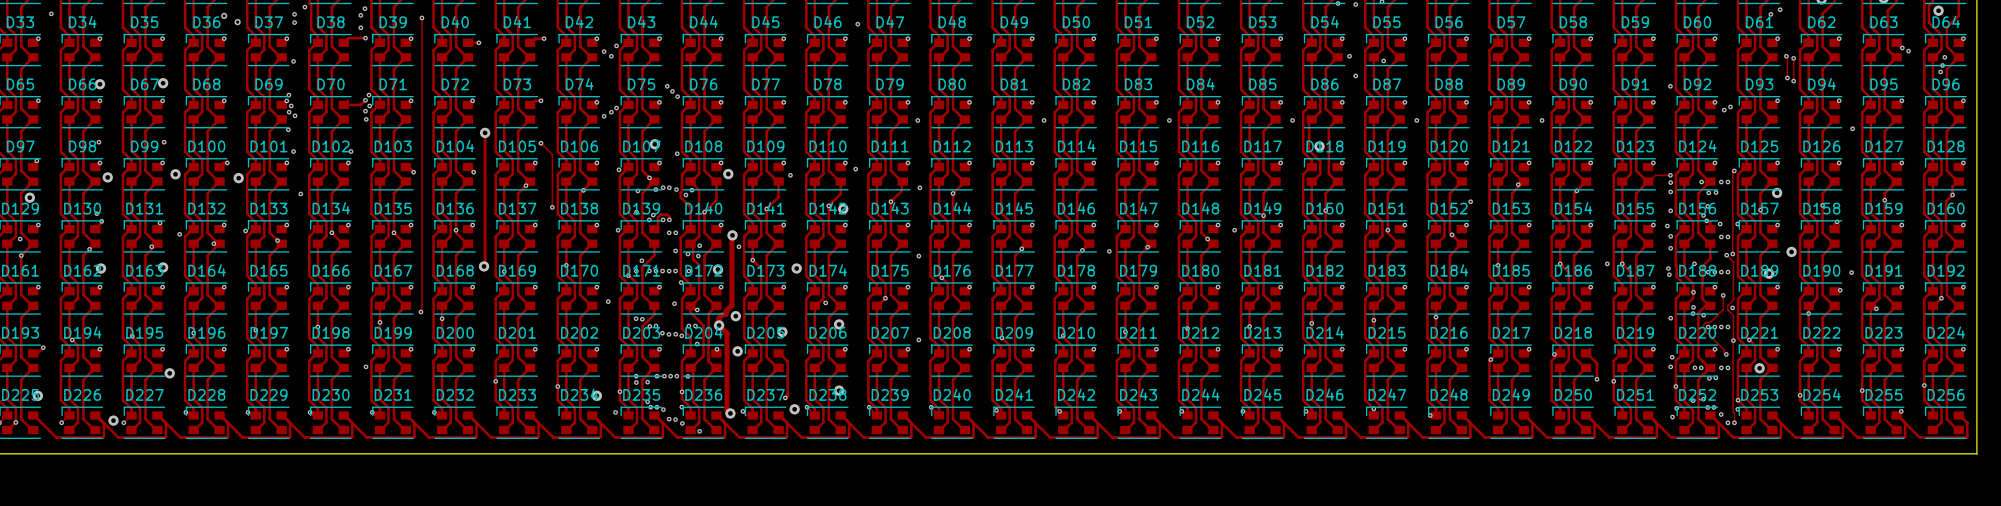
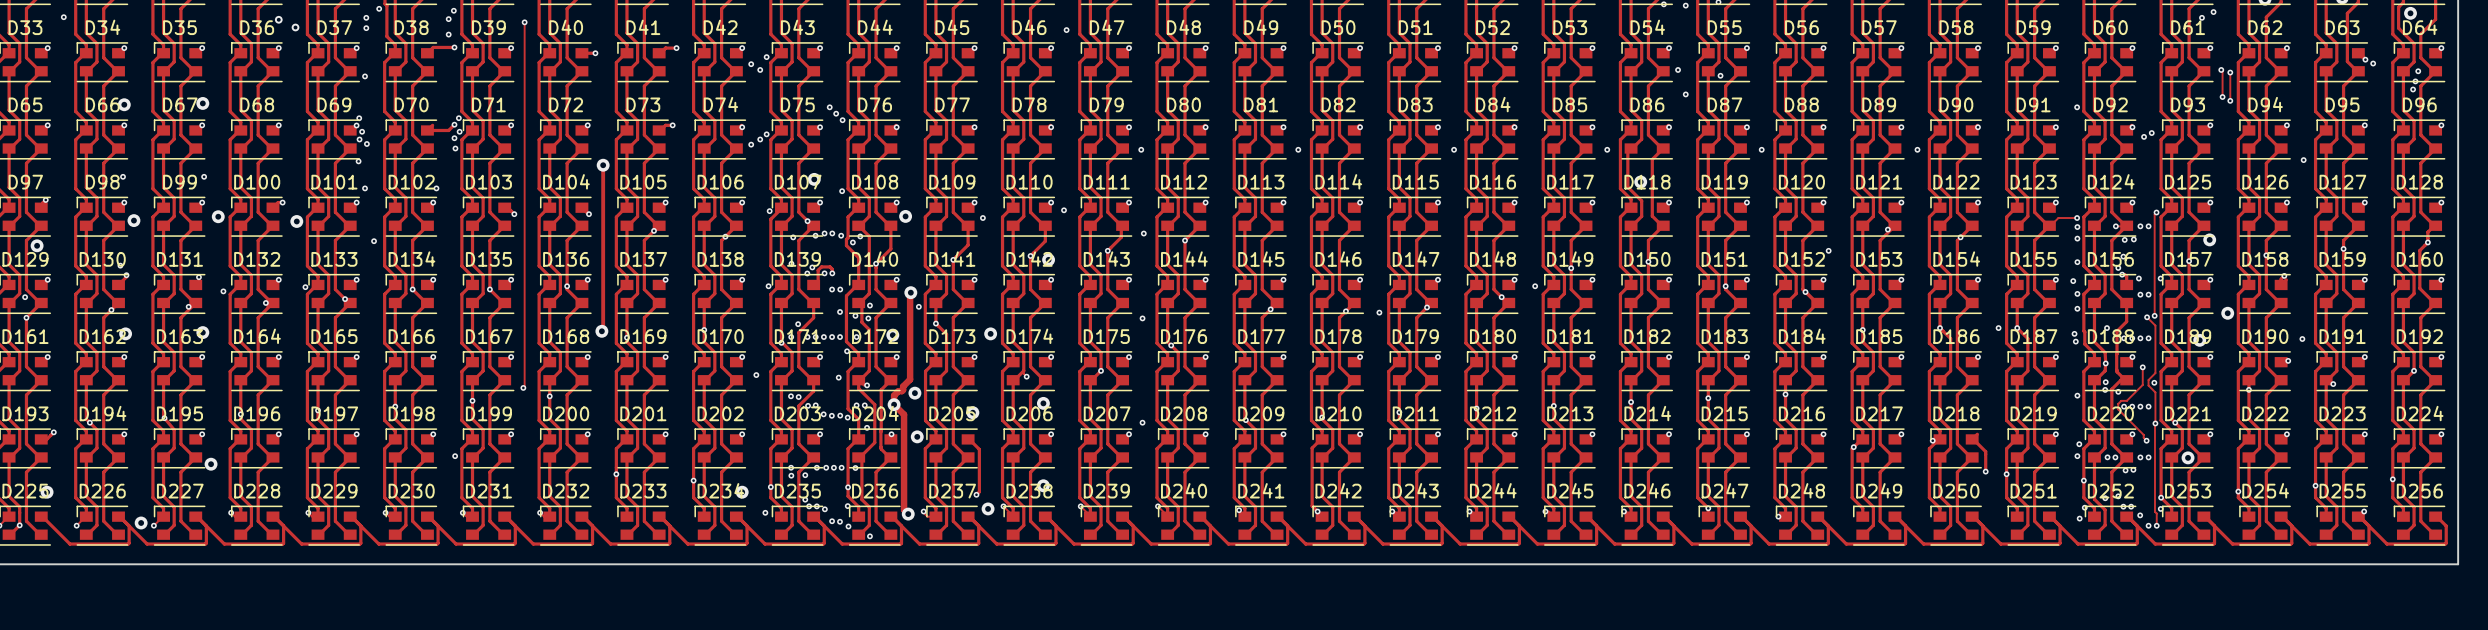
track: (540, 143) (552, 154) (552, 207) -> none
via: (540, 143) -> none
via: (552, 207) -> none

